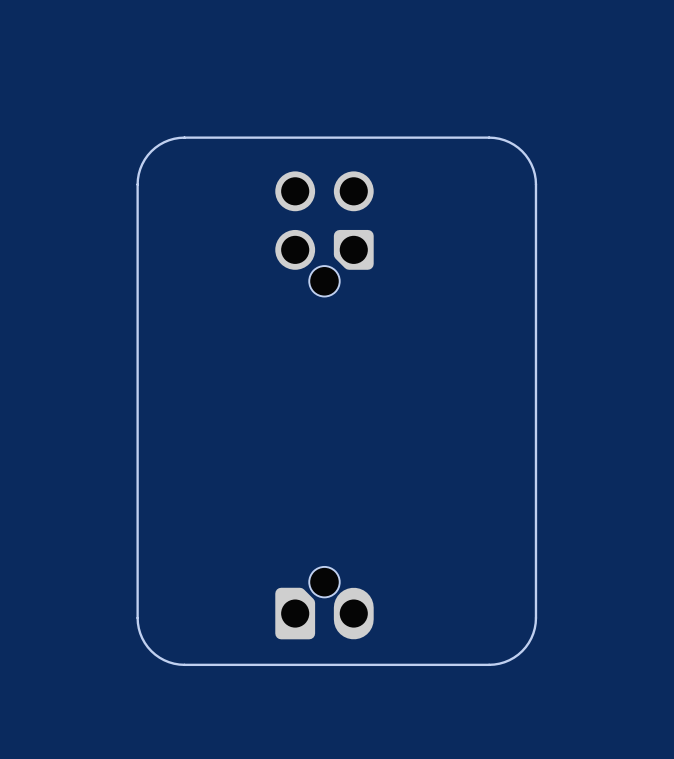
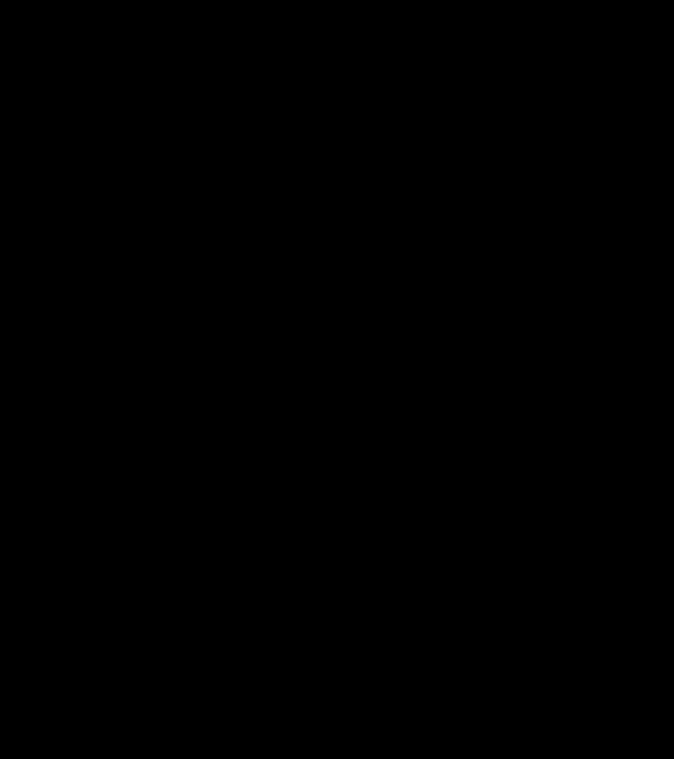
board edge: (489, 137) (179, 137) (159, 144) (144, 159) (140, 169) (137, 184) (137, 617) (142, 638) (147, 647) (159, 657) (169, 662) (184, 664) (489, 664) (509, 660) (518, 654) (528, 642) (533, 633) (535, 617) (535, 179) (531, 164) (518, 147) (504, 140) (489, 137) -> none
part: (324, 233) -> none
part: (324, 603) -> none

